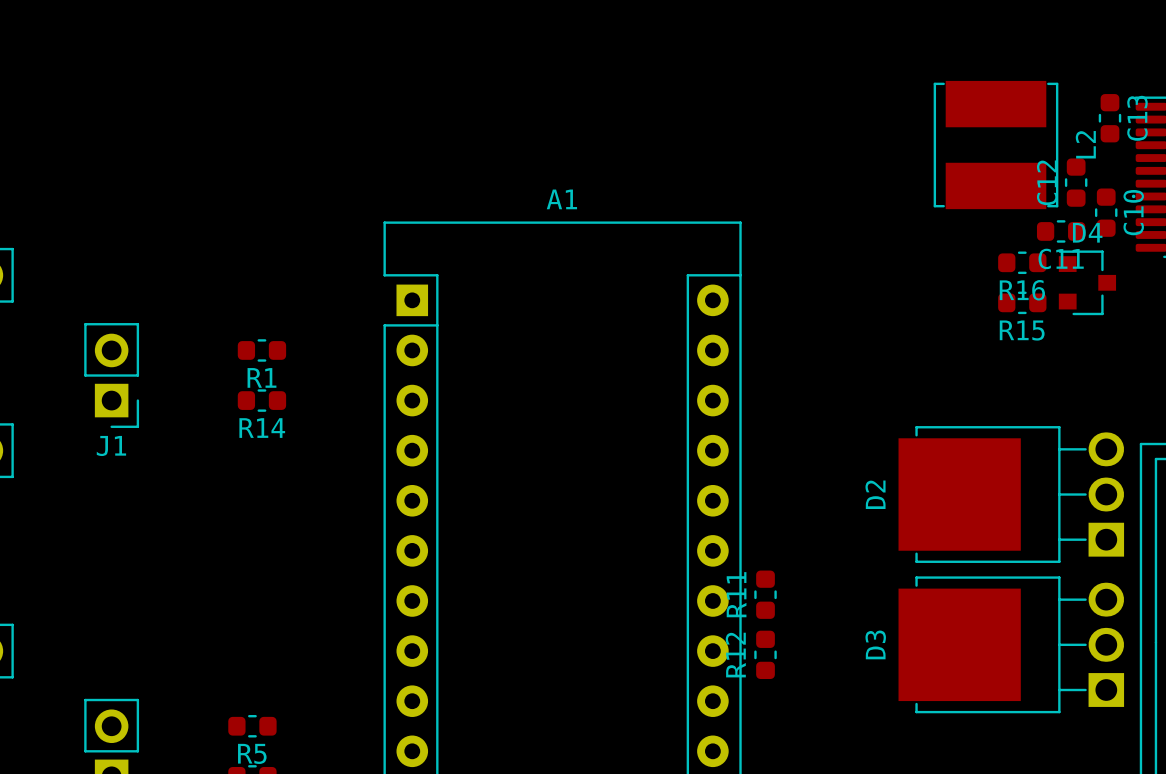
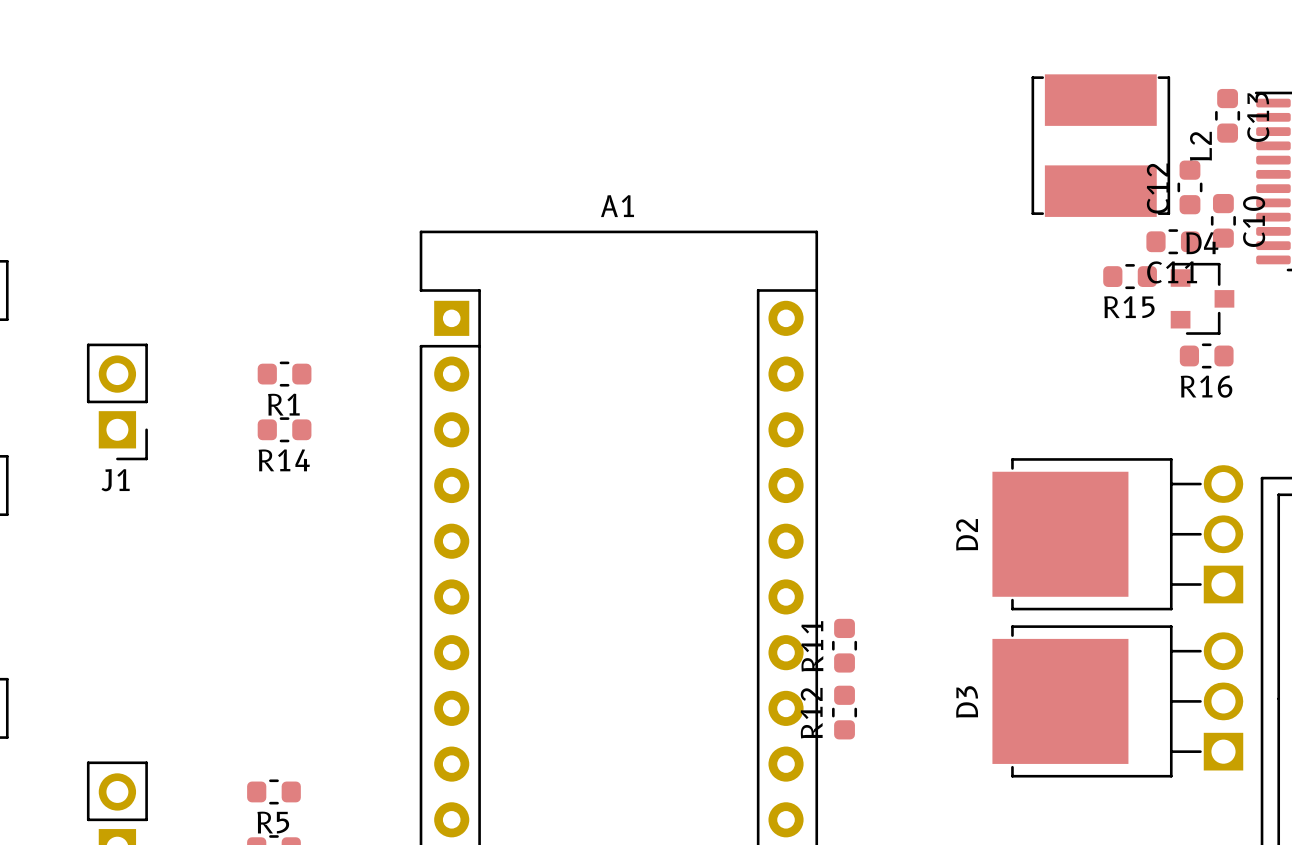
R16 name: R16 (1022, 290) -> R15 (1129, 307)
R15: (1022, 302) -> none
R16: none -> (1206, 355)

